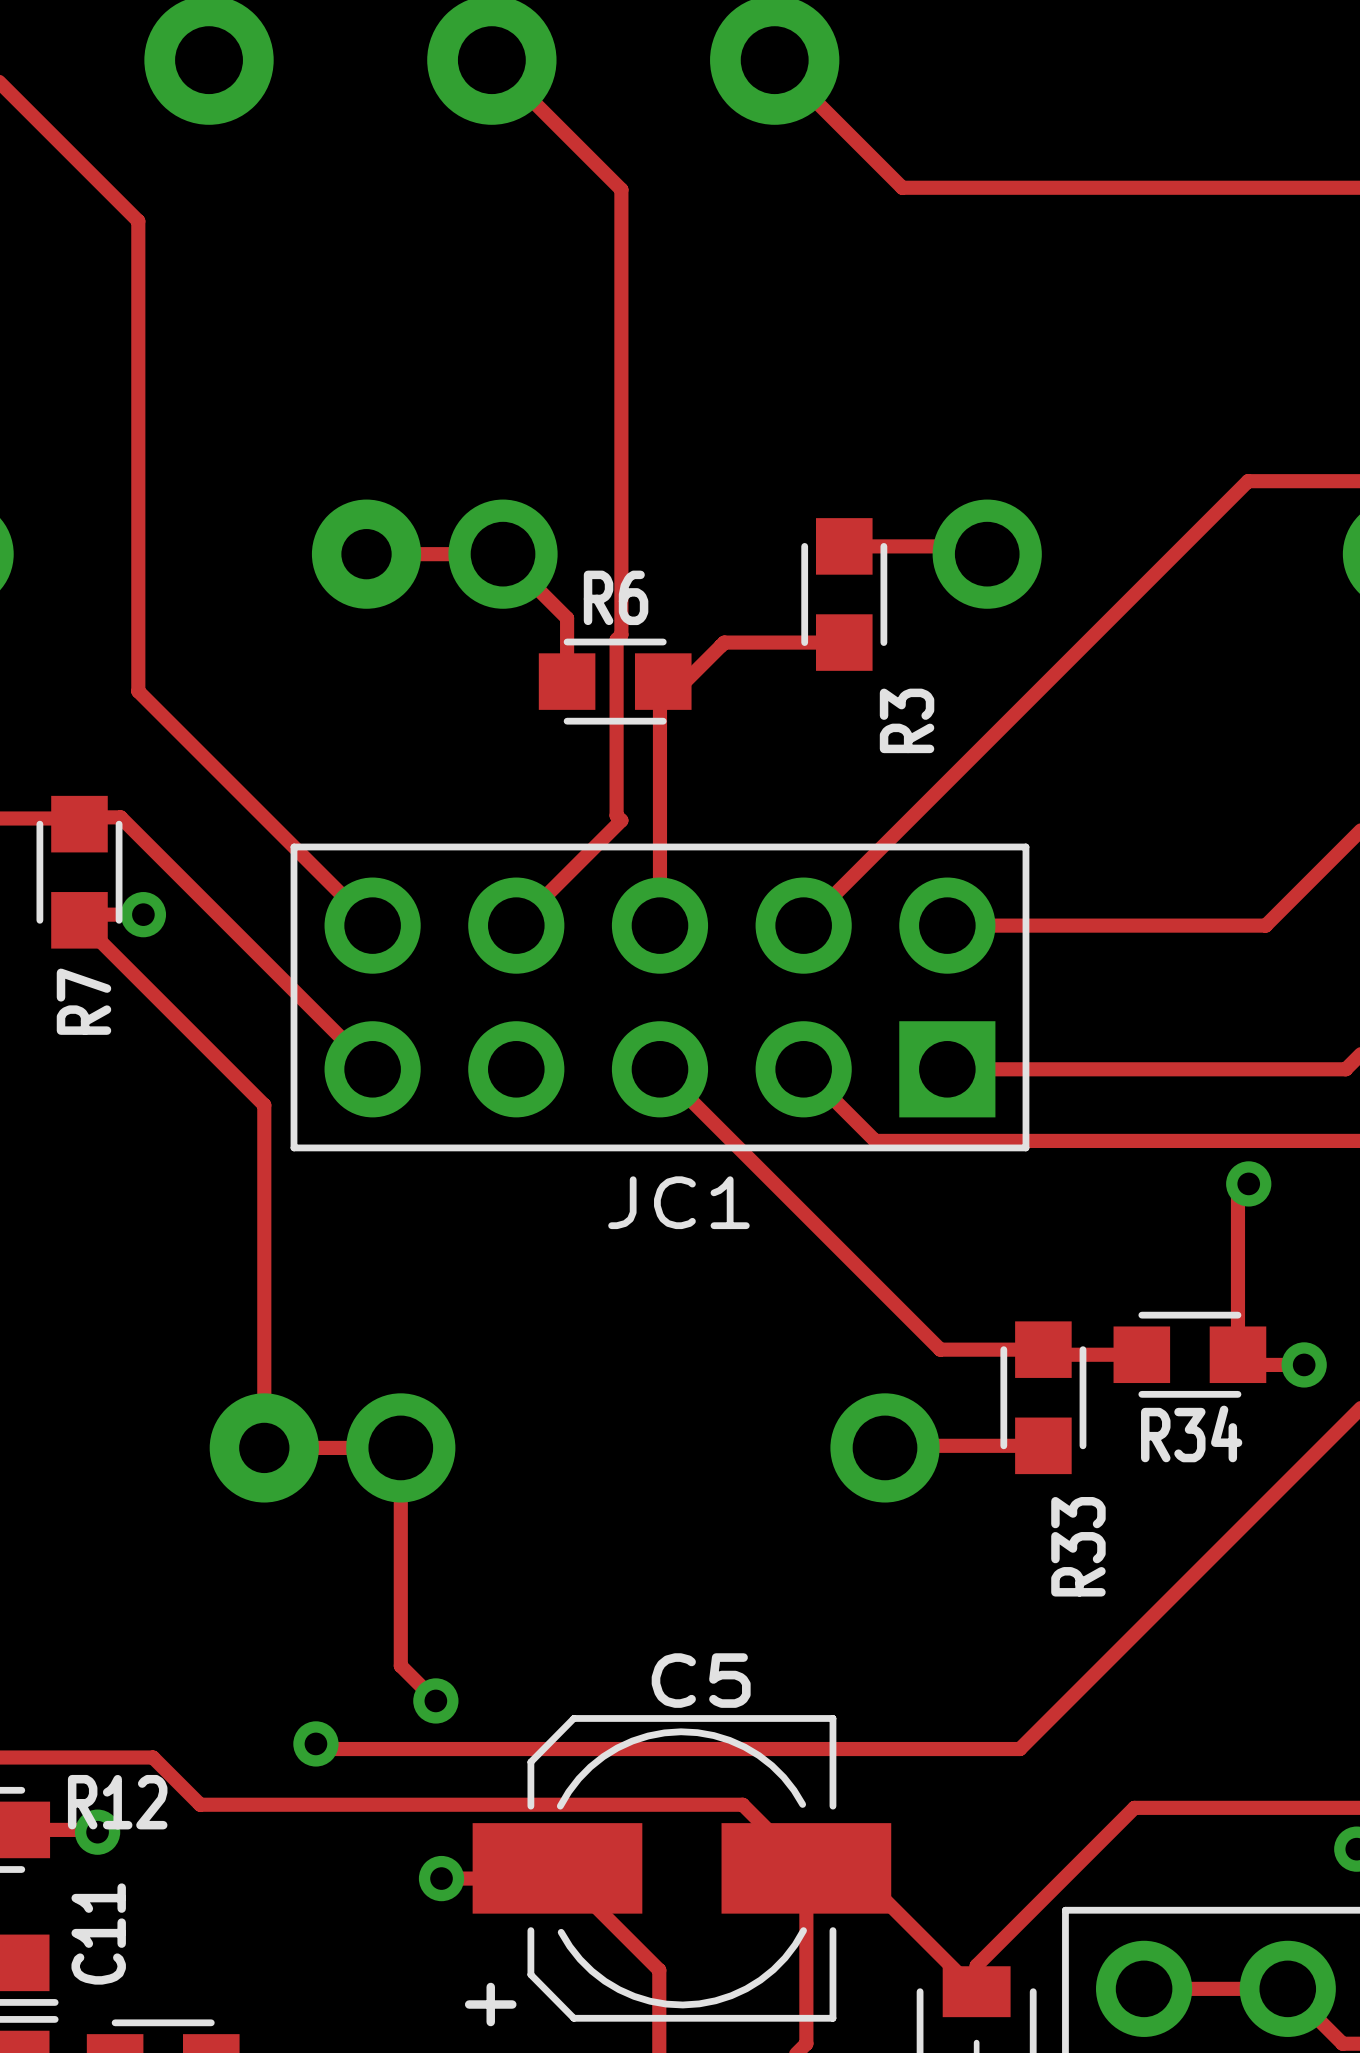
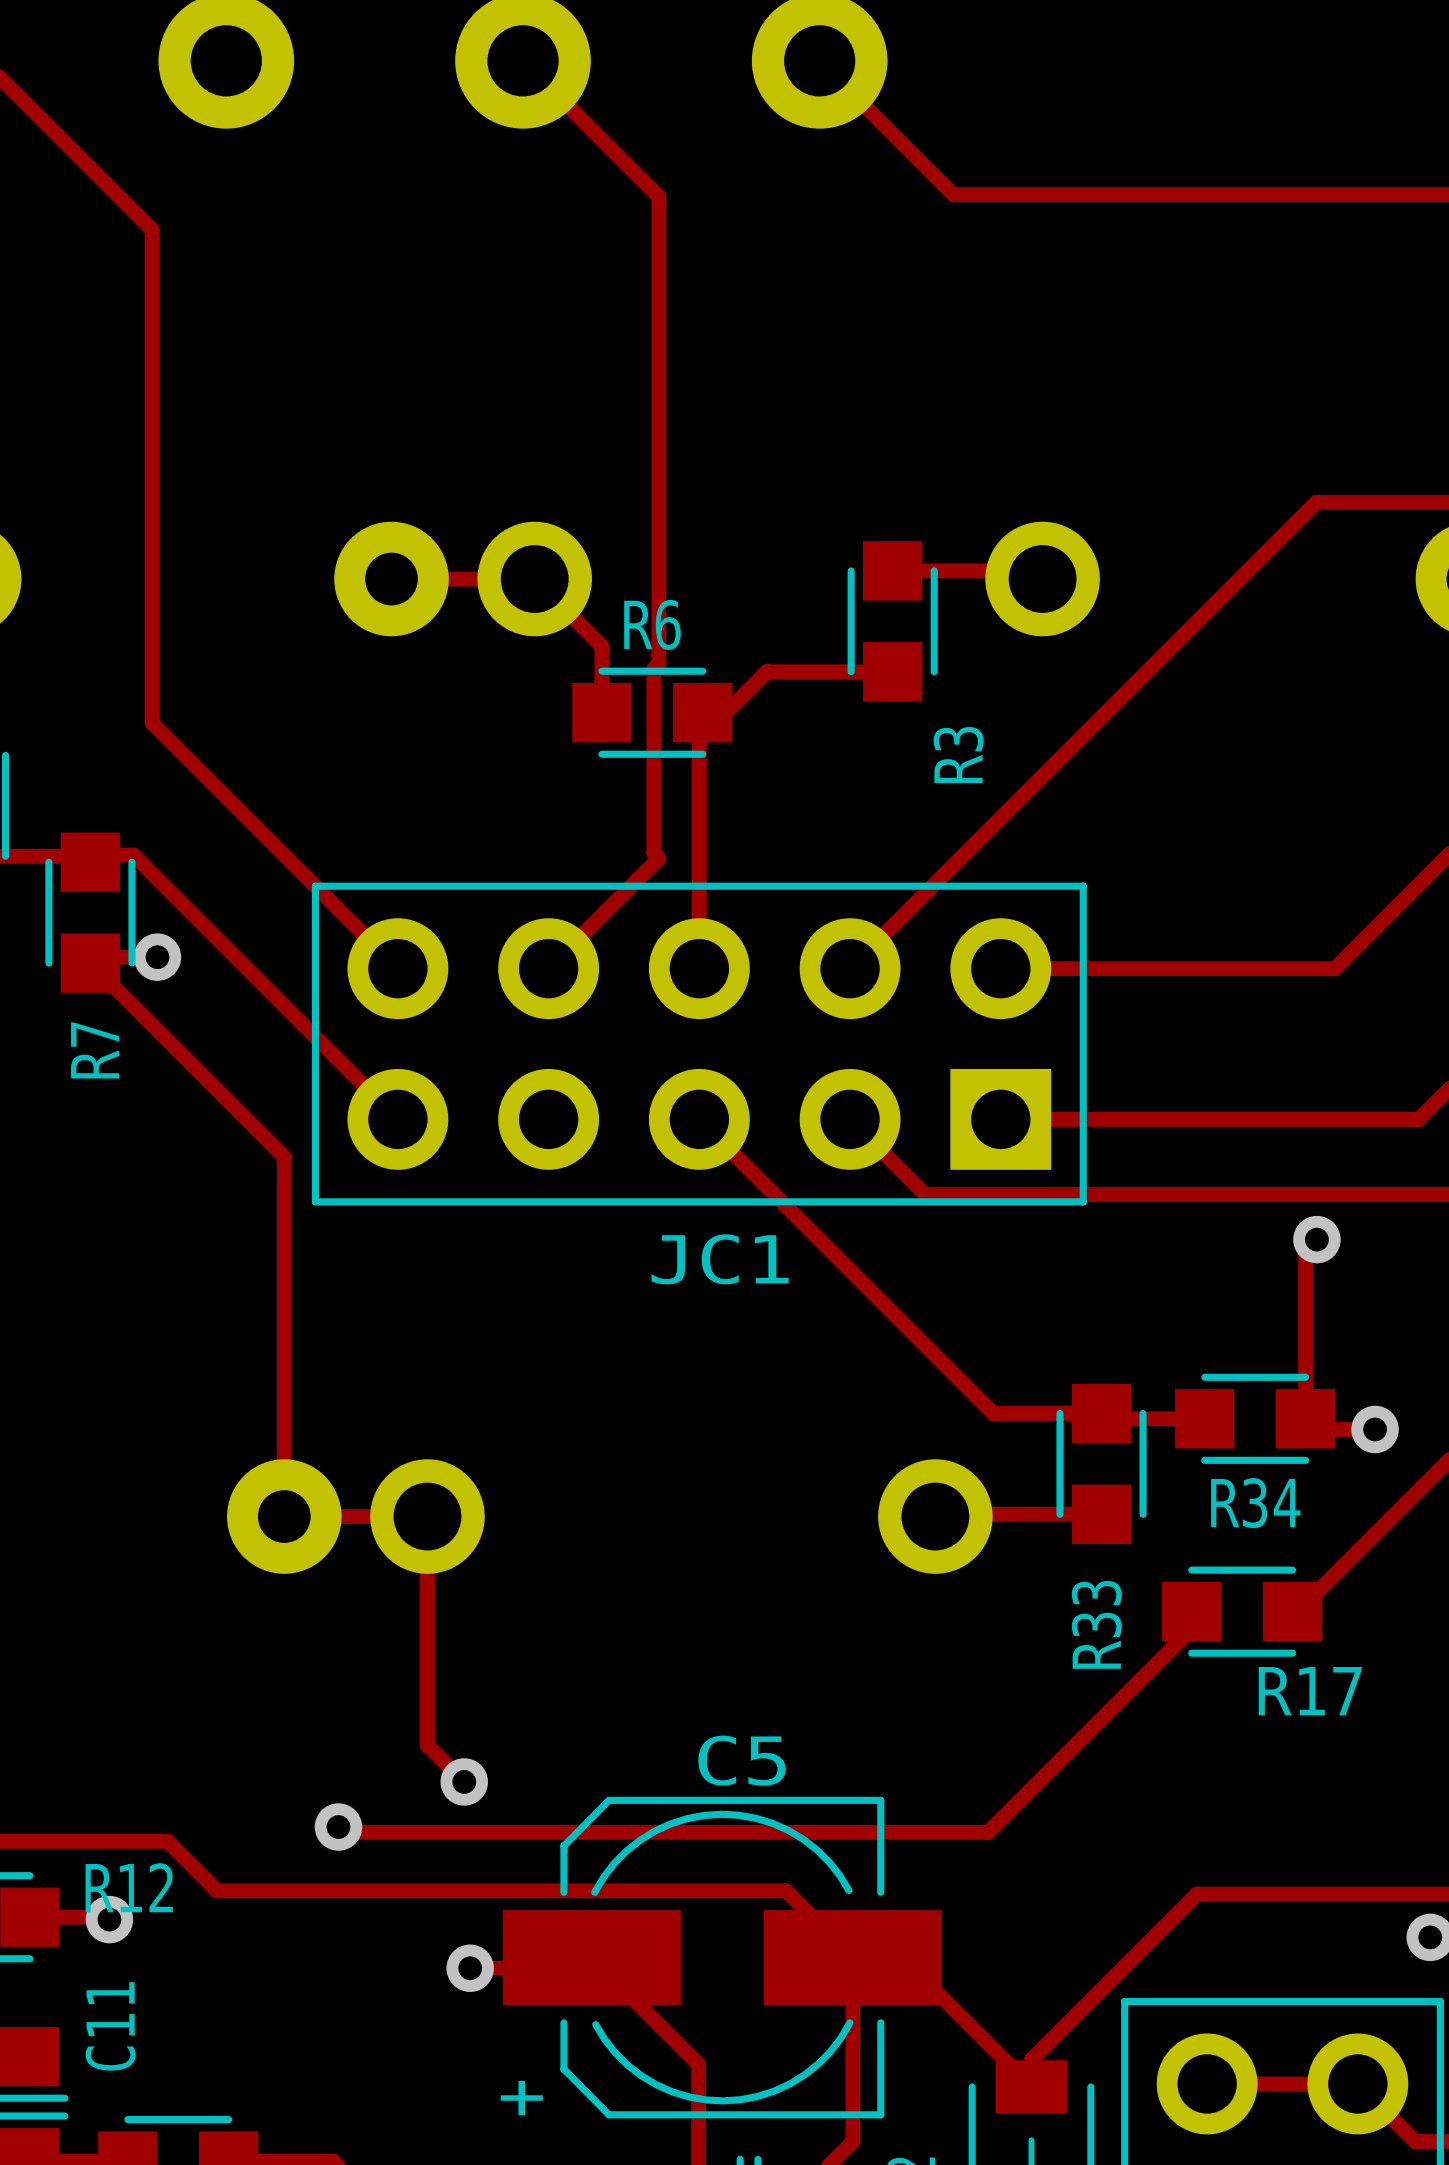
R17: none -> (1242, 1611)
track: (1230, 1538) (1019, 1749) (935, 1749) -> (1191, 1628) (988, 1832)
R33 name position: R33 (1078, 1546) -> R33 (1096, 1624)

